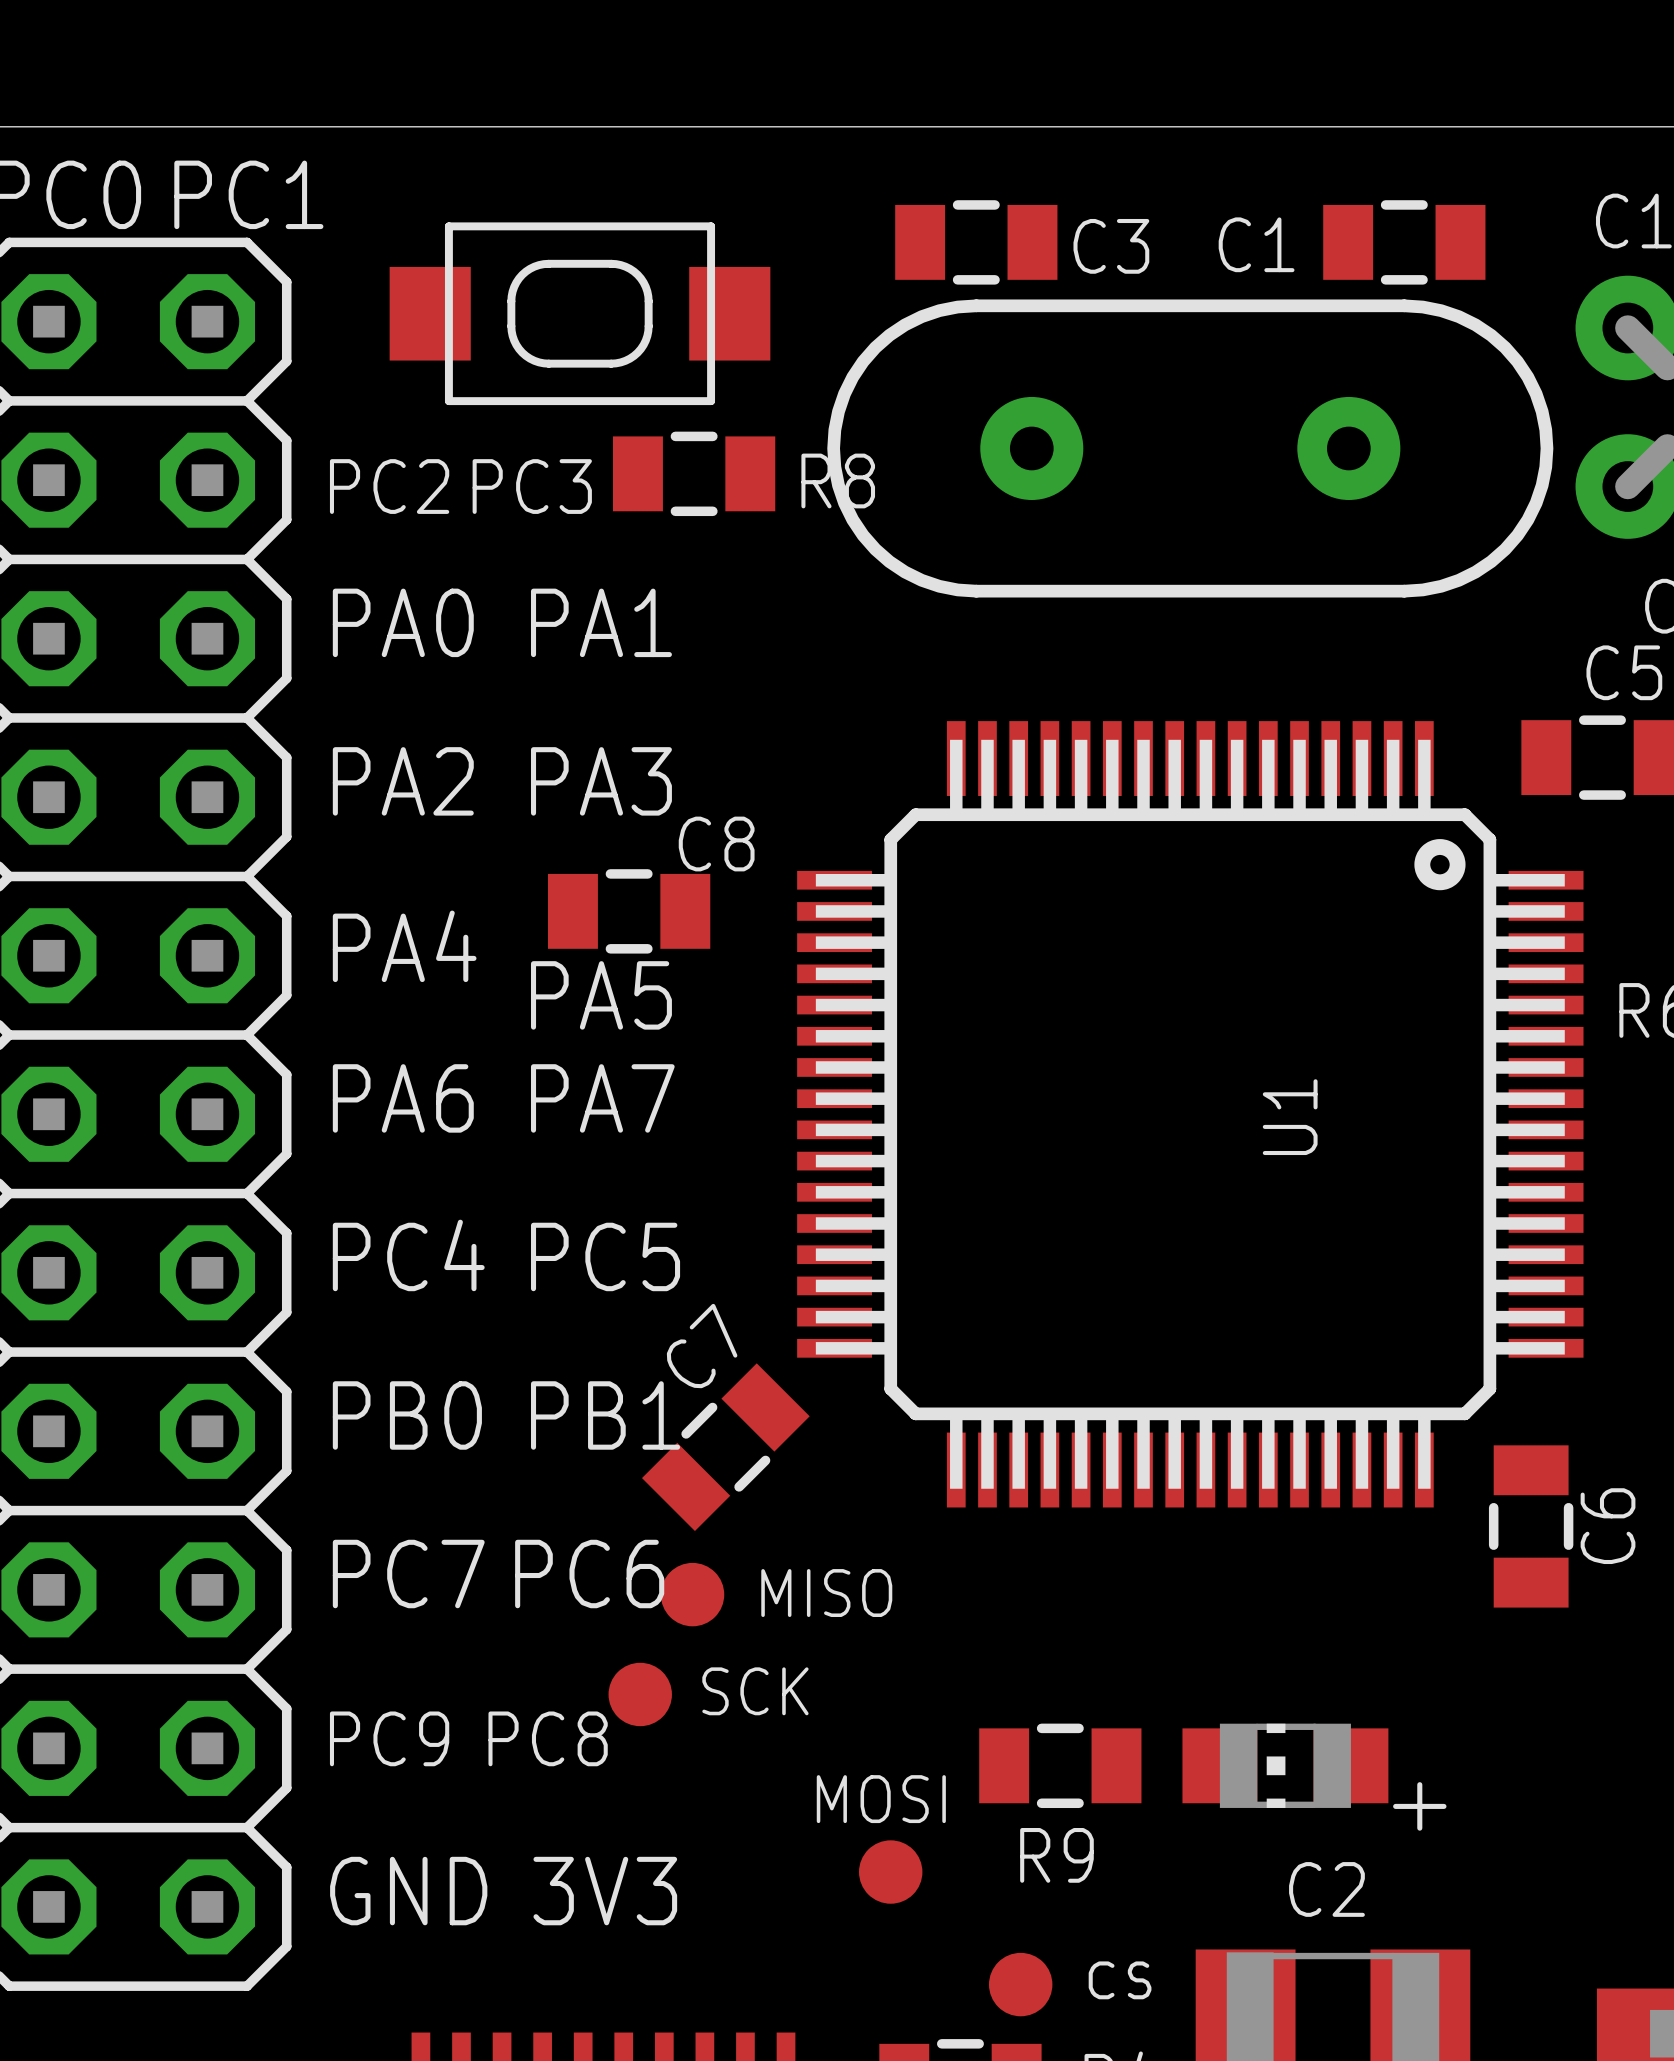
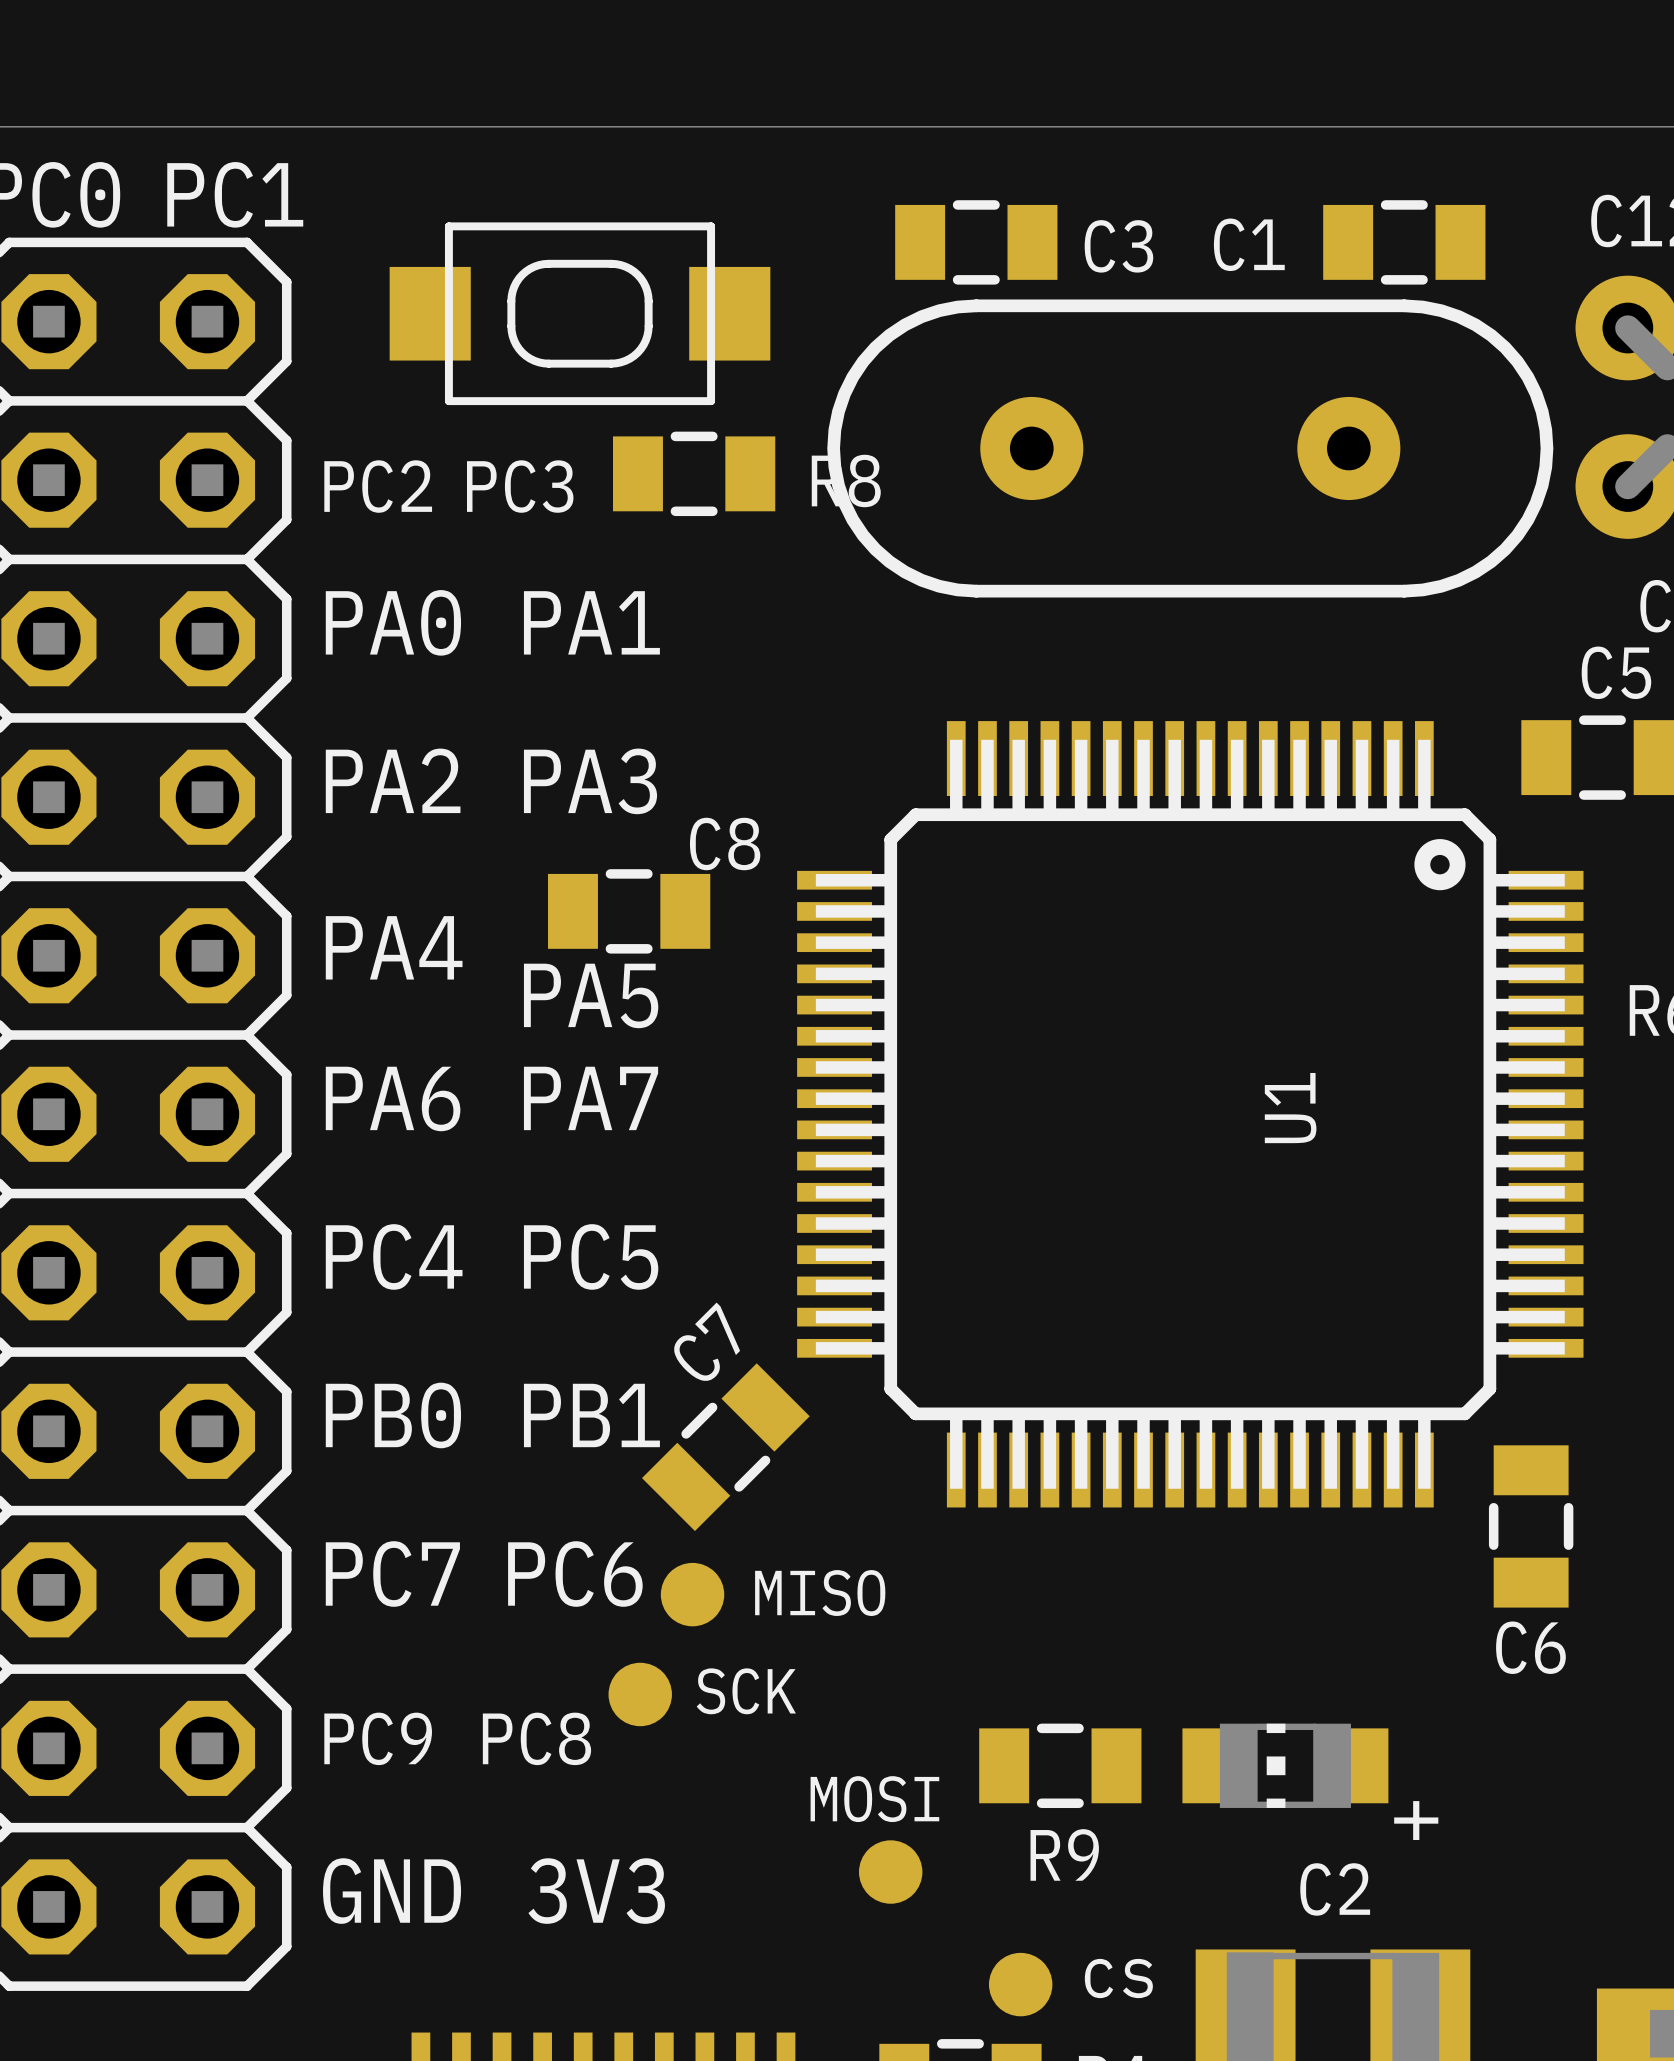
C6 name rotation: 0° (1608, 1526) -> 90° clockwise (1530, 1647)
C6 name position: C6 (1608, 1526) -> C6 (1530, 1647)

